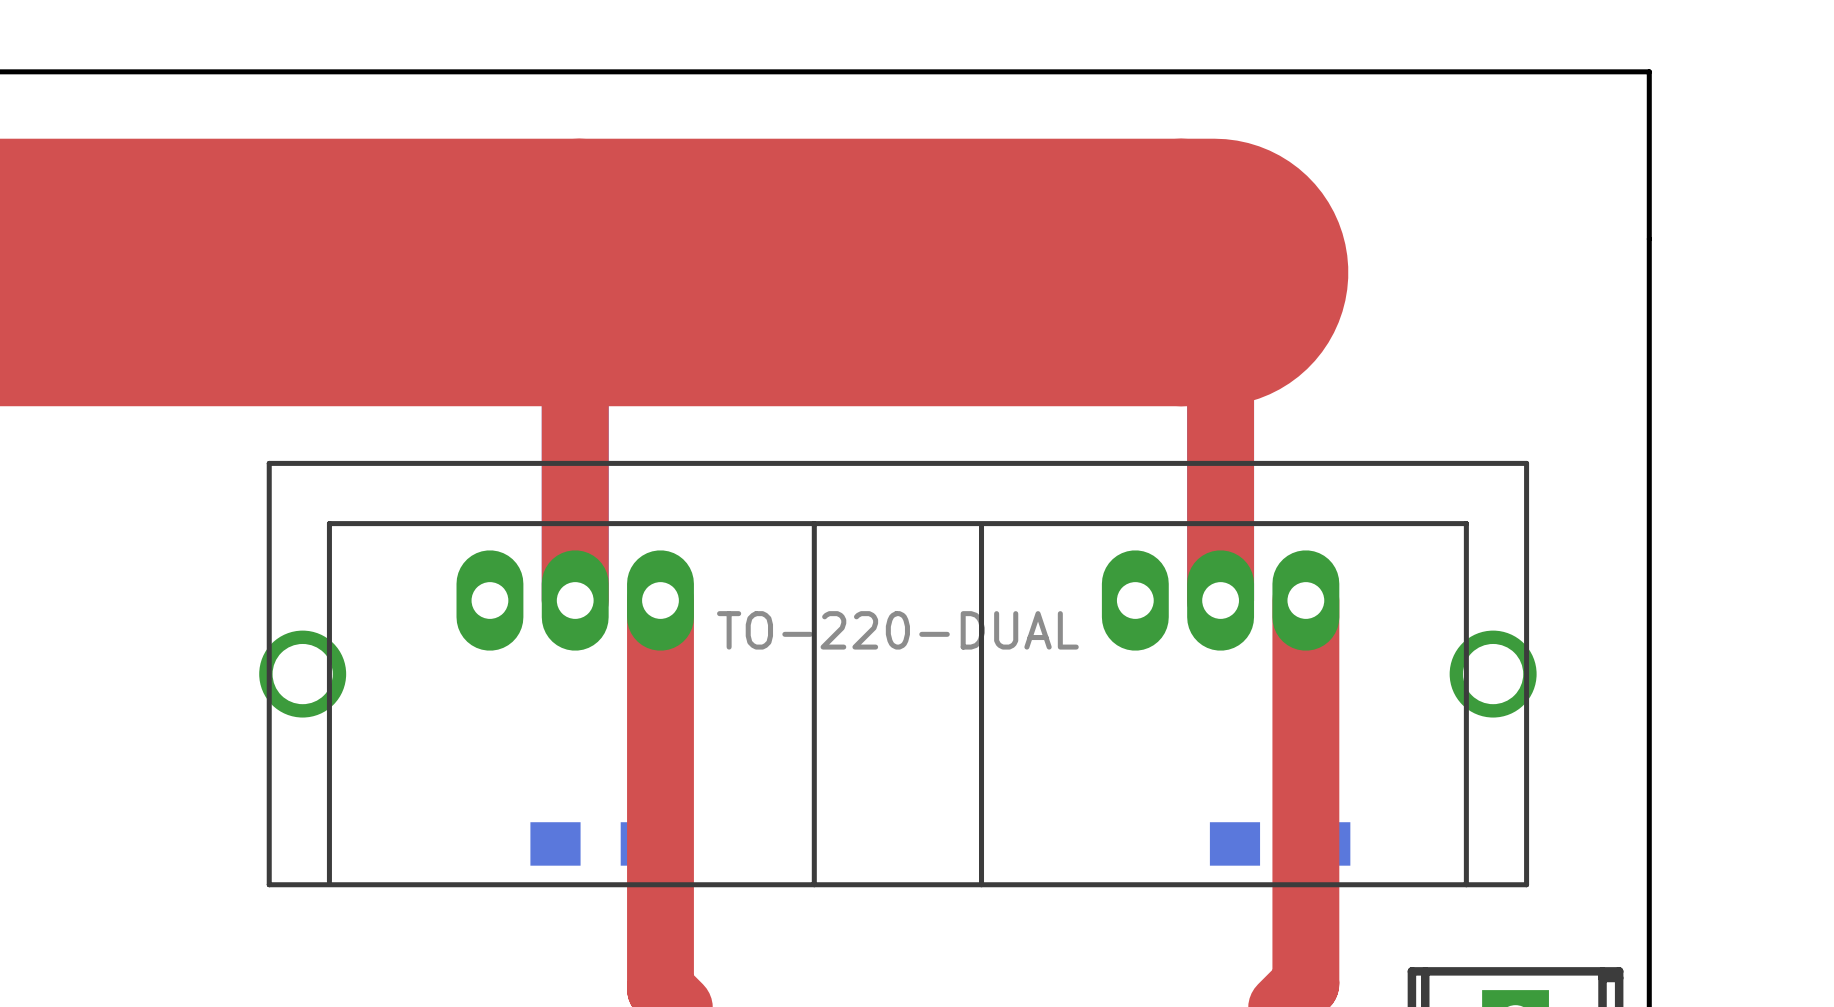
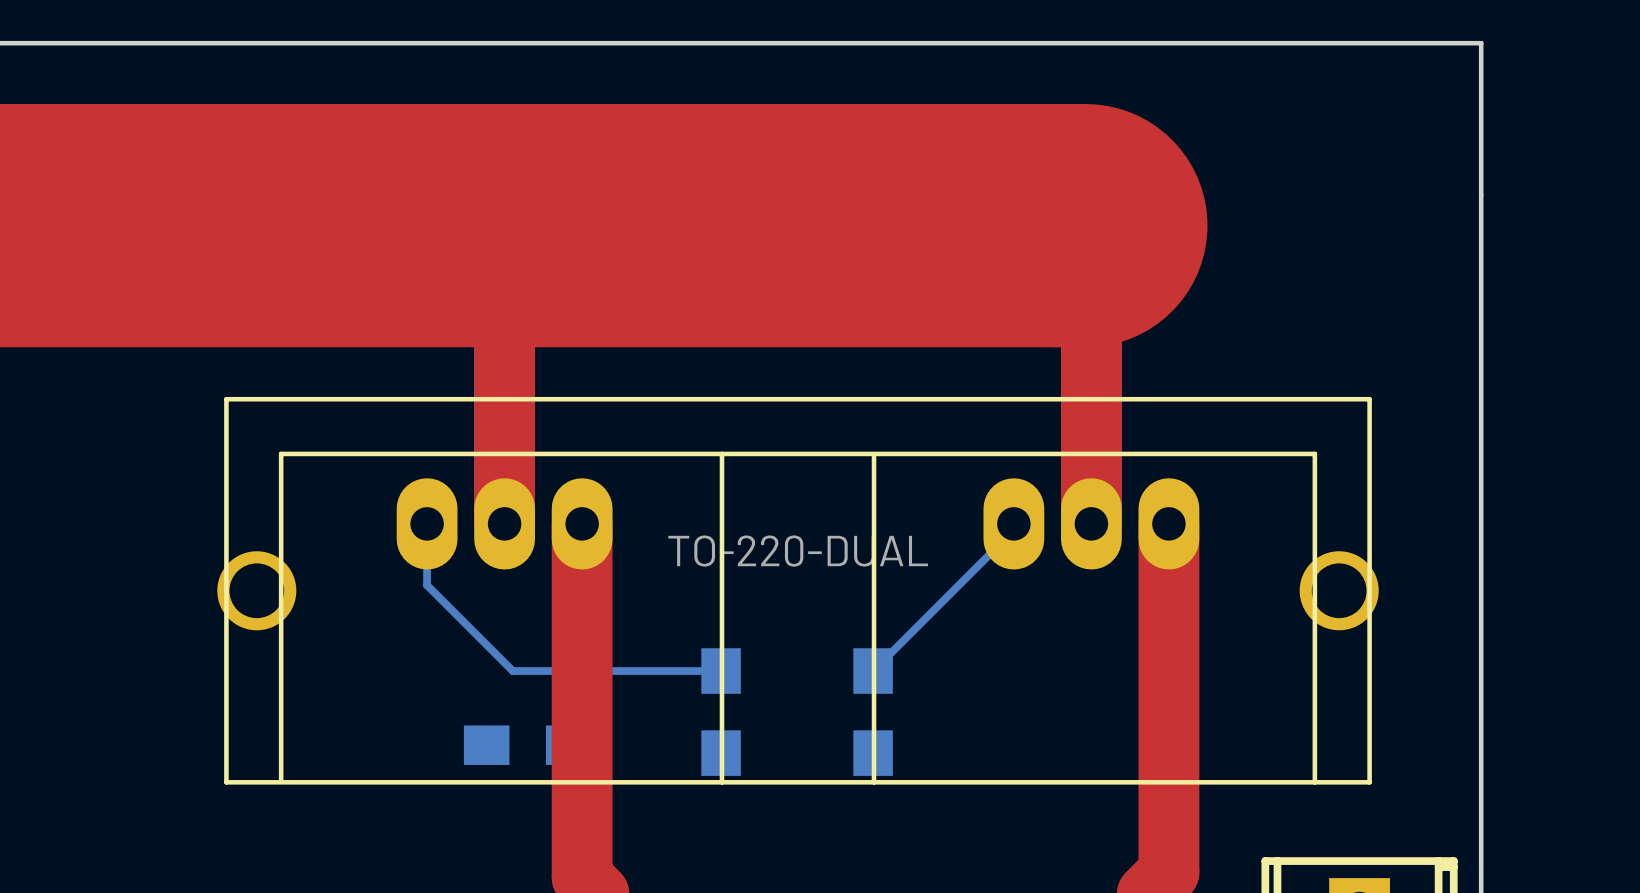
bottom track: none -> (427, 523) (427, 585) (512, 671) (721, 671)
bottom track: none -> (1013, 523) (1013, 530) (873, 671)
part: none -> (721, 712)
part: none -> (873, 712)
part: (1280, 843) -> none

